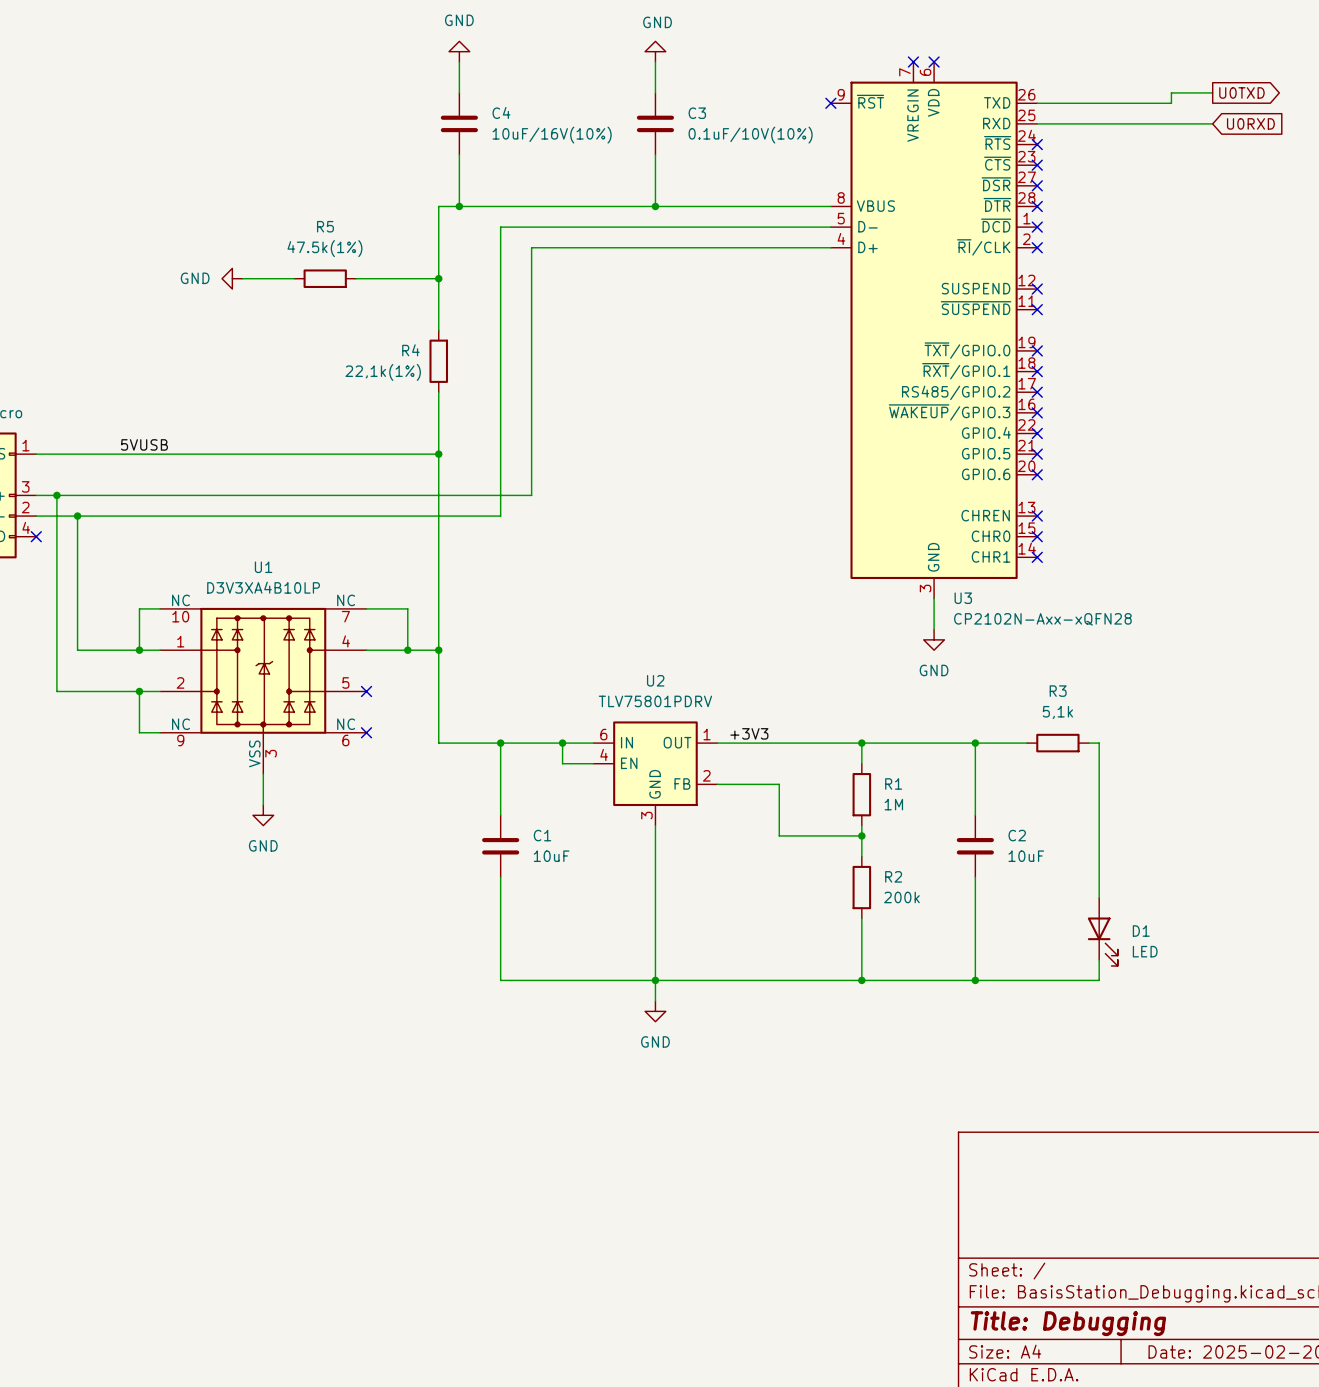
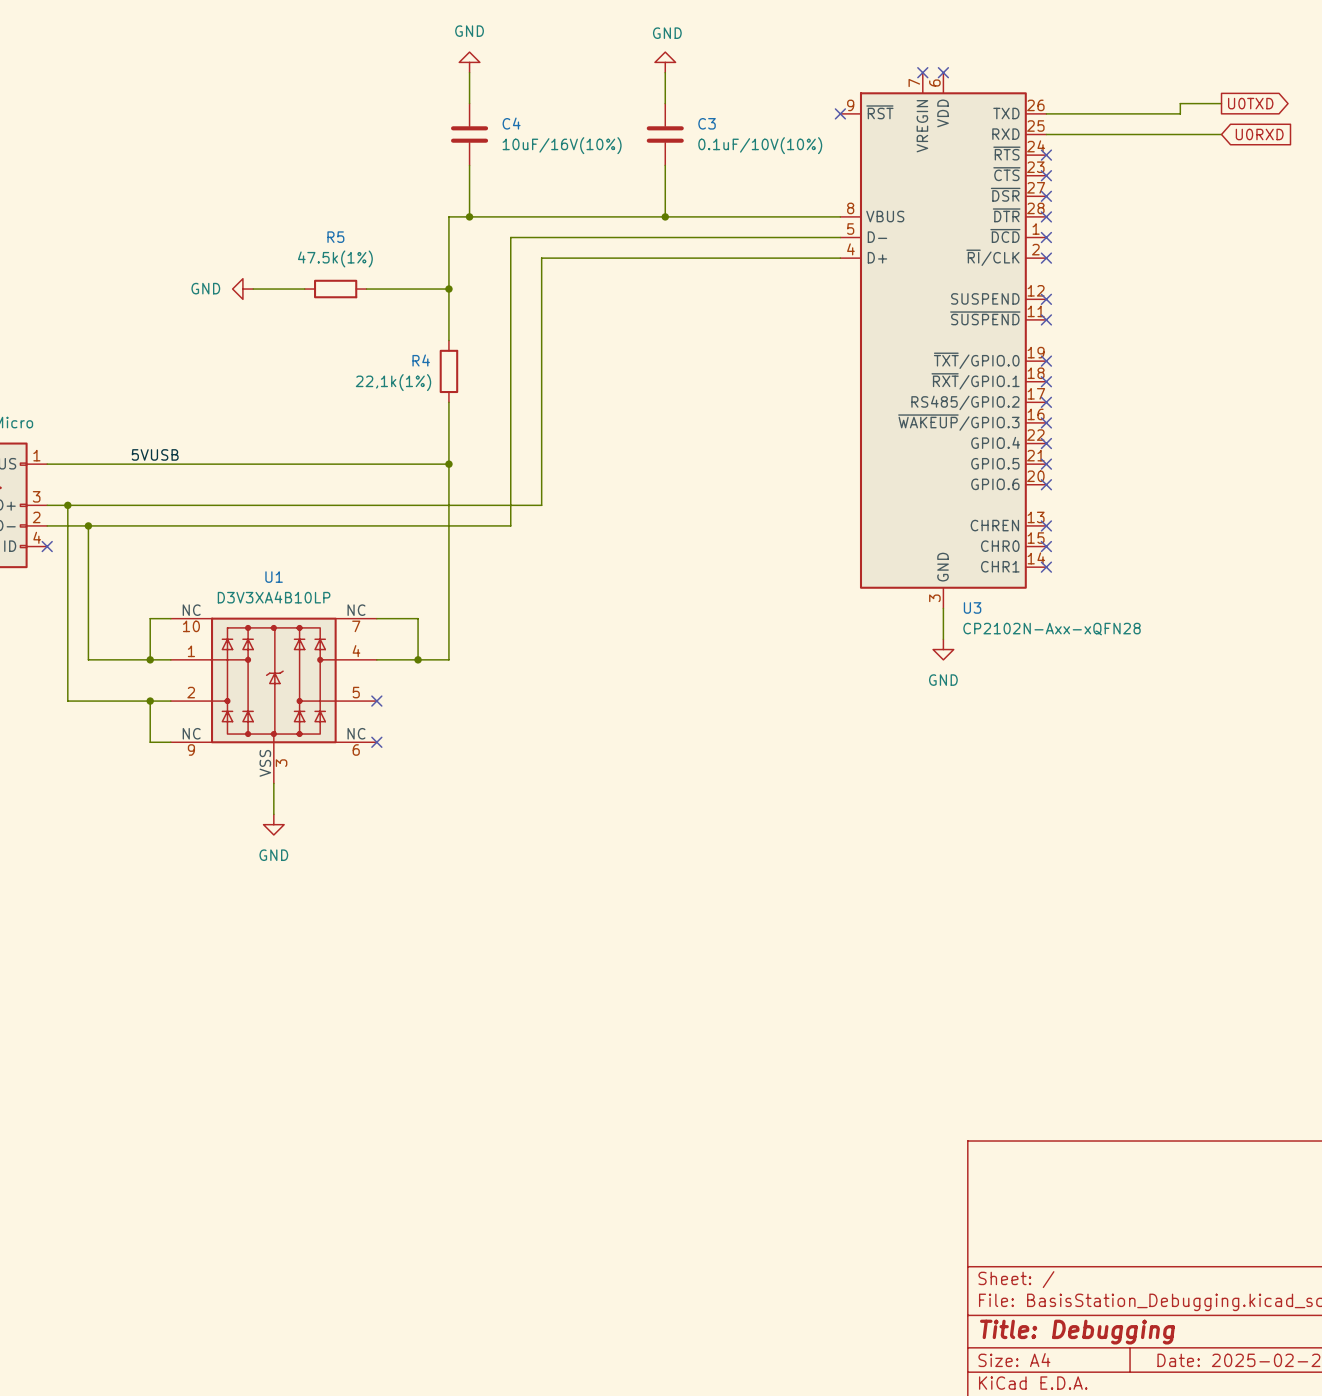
wire: (438, 650) (438, 743) (593, 743) -> none
junction: (438, 650) -> none
label: +3V3 (749, 733) -> none
wire: (500, 743) (500, 815) -> none
junction: (500, 743) -> none
wire: (562, 743) (562, 763) (593, 763) -> none
junction: (562, 743) -> none
wire: (717, 743) (1026, 743) -> none
wire: (861, 743) (861, 763) -> none
junction: (861, 743) -> none
wire: (975, 743) (975, 815) -> none
junction: (975, 743) -> none
R3: 5,1k (1057, 743) -> none
wire: (1088, 743) (1099, 743) (1099, 897) -> none
U2: TLV75801PDRV (655, 773) -> none
wire: (717, 784) (779, 784) (779, 835) (861, 835) -> none
R1: 1M (861, 794) -> none
wire: (655, 825) (655, 1001) -> none
wire: (861, 825) (861, 856) -> none
junction: (861, 835) -> none
C1: 10uF (500, 846) -> none
C2: 10uF (975, 846) -> none
wire: (500, 877) (500, 980) (1099, 980) (1099, 959) -> none
wire: (975, 877) (975, 980) -> none
R2: 200k (861, 887) -> none
wire: (861, 918) (861, 980) -> none
D1: LED (1102, 931) -> none
junction: (655, 980) -> none
junction: (861, 980) -> none
junction: (975, 980) -> none
power symbol: GND (655, 1011) -> none

